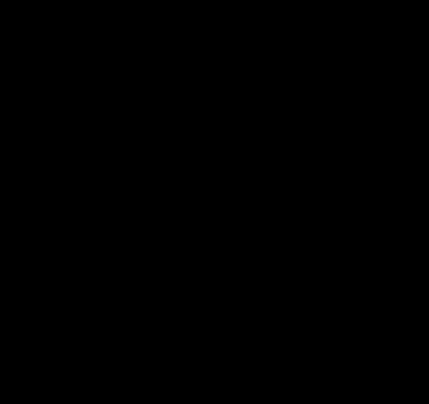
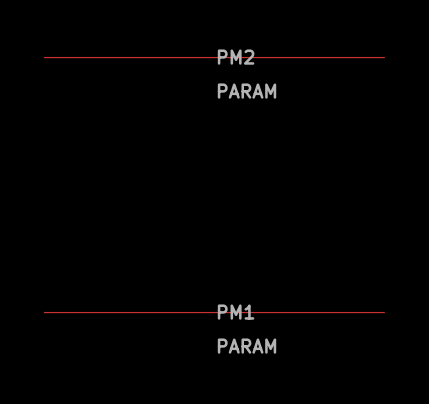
PM2: none -> PARAM (214, 57)
PM1: none -> PARAM (214, 312)

